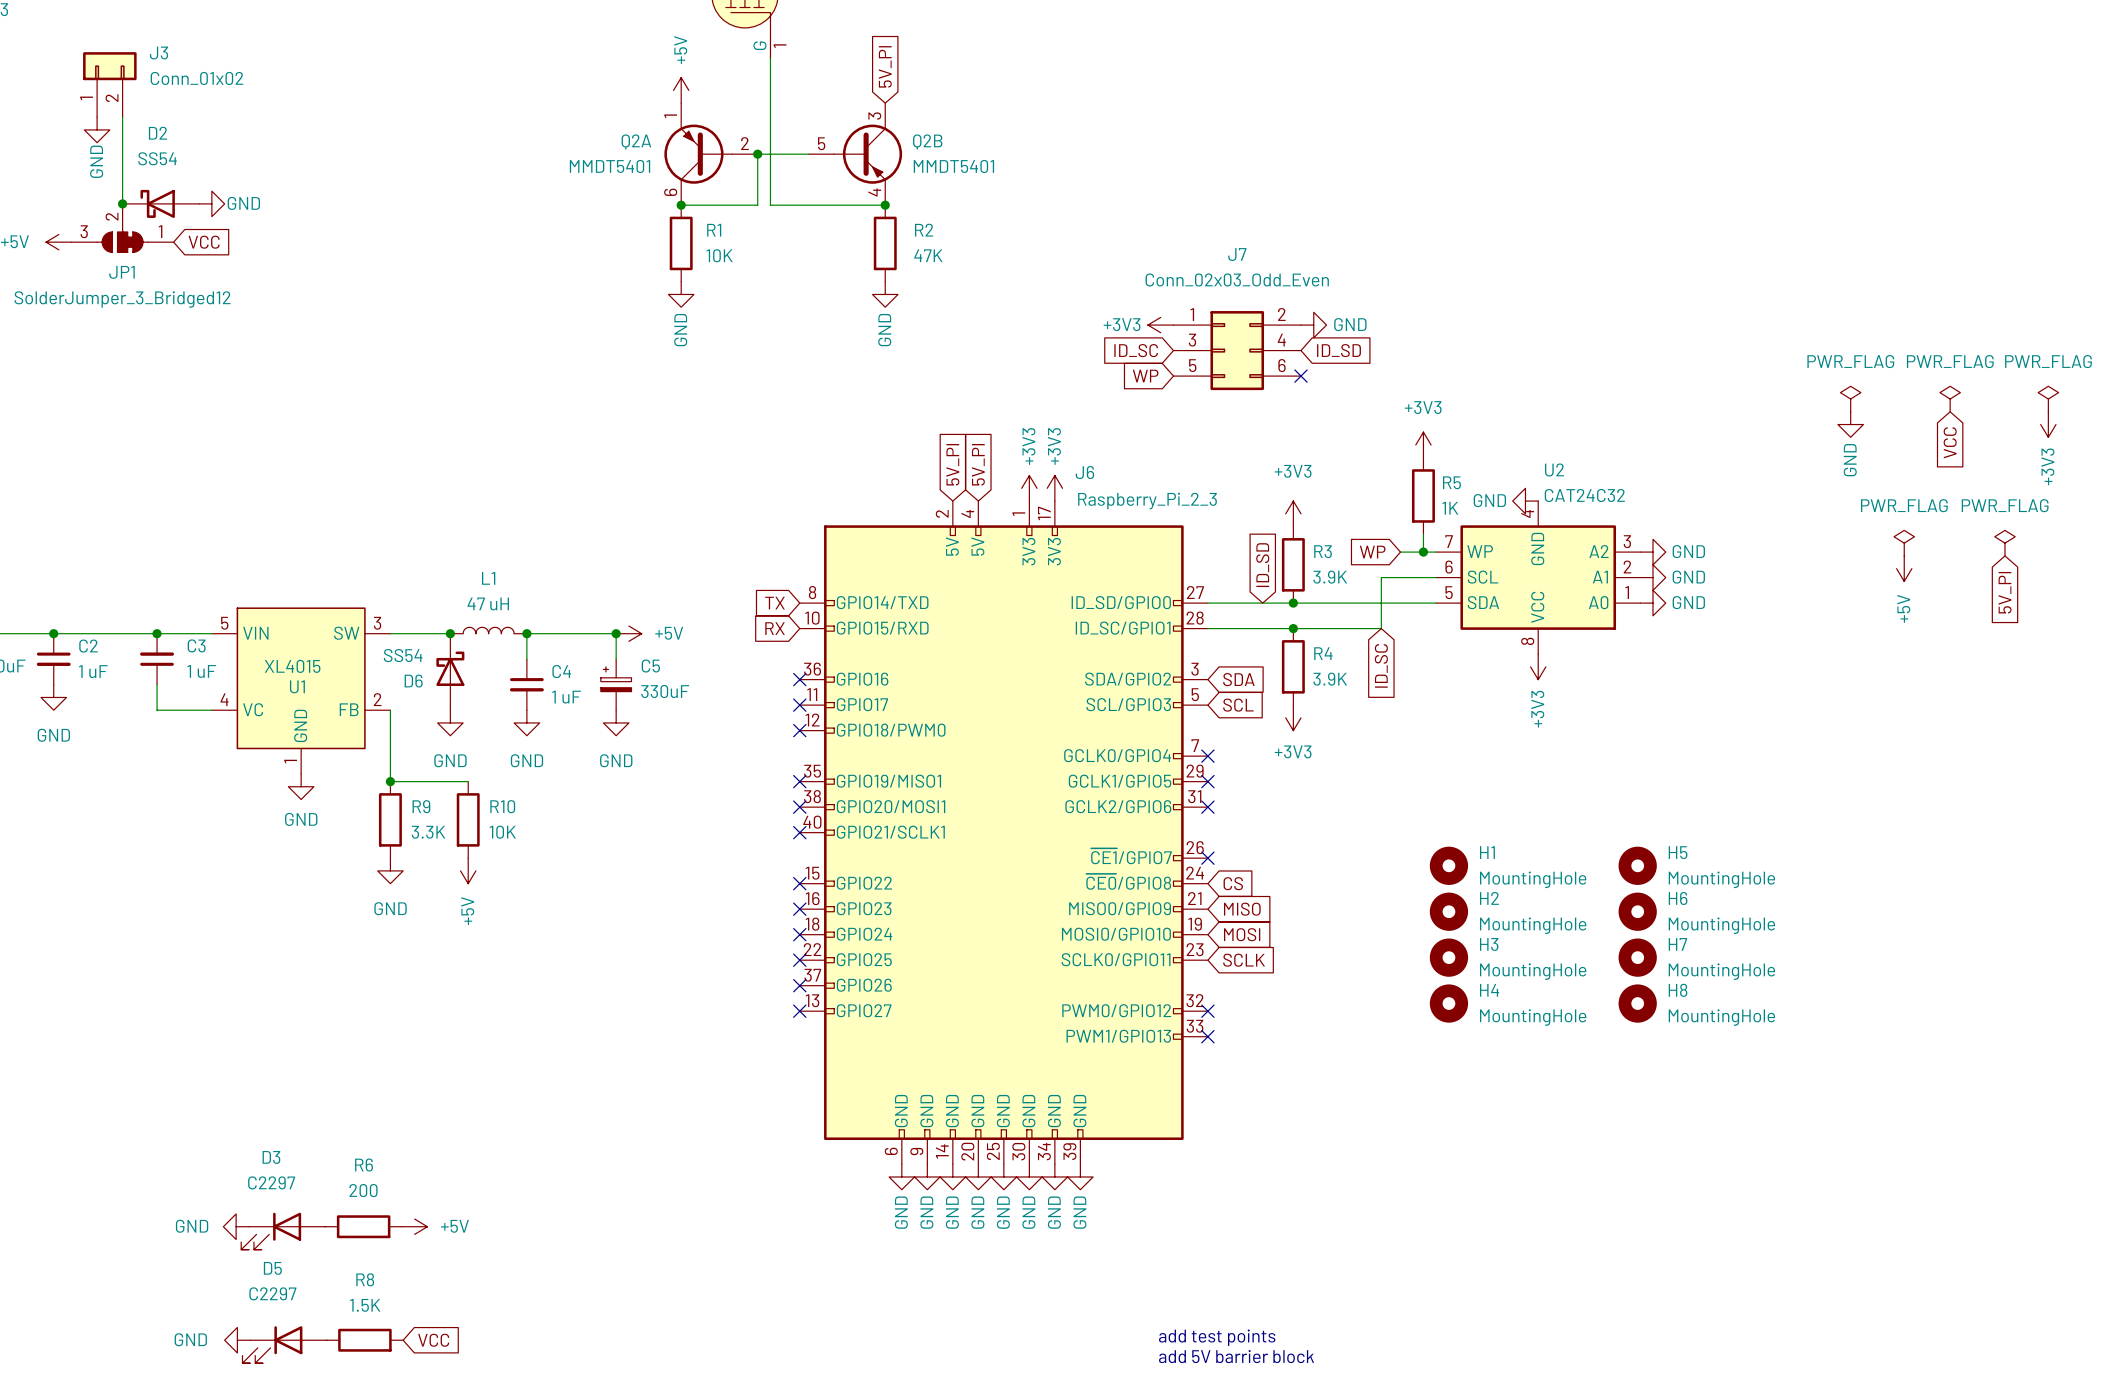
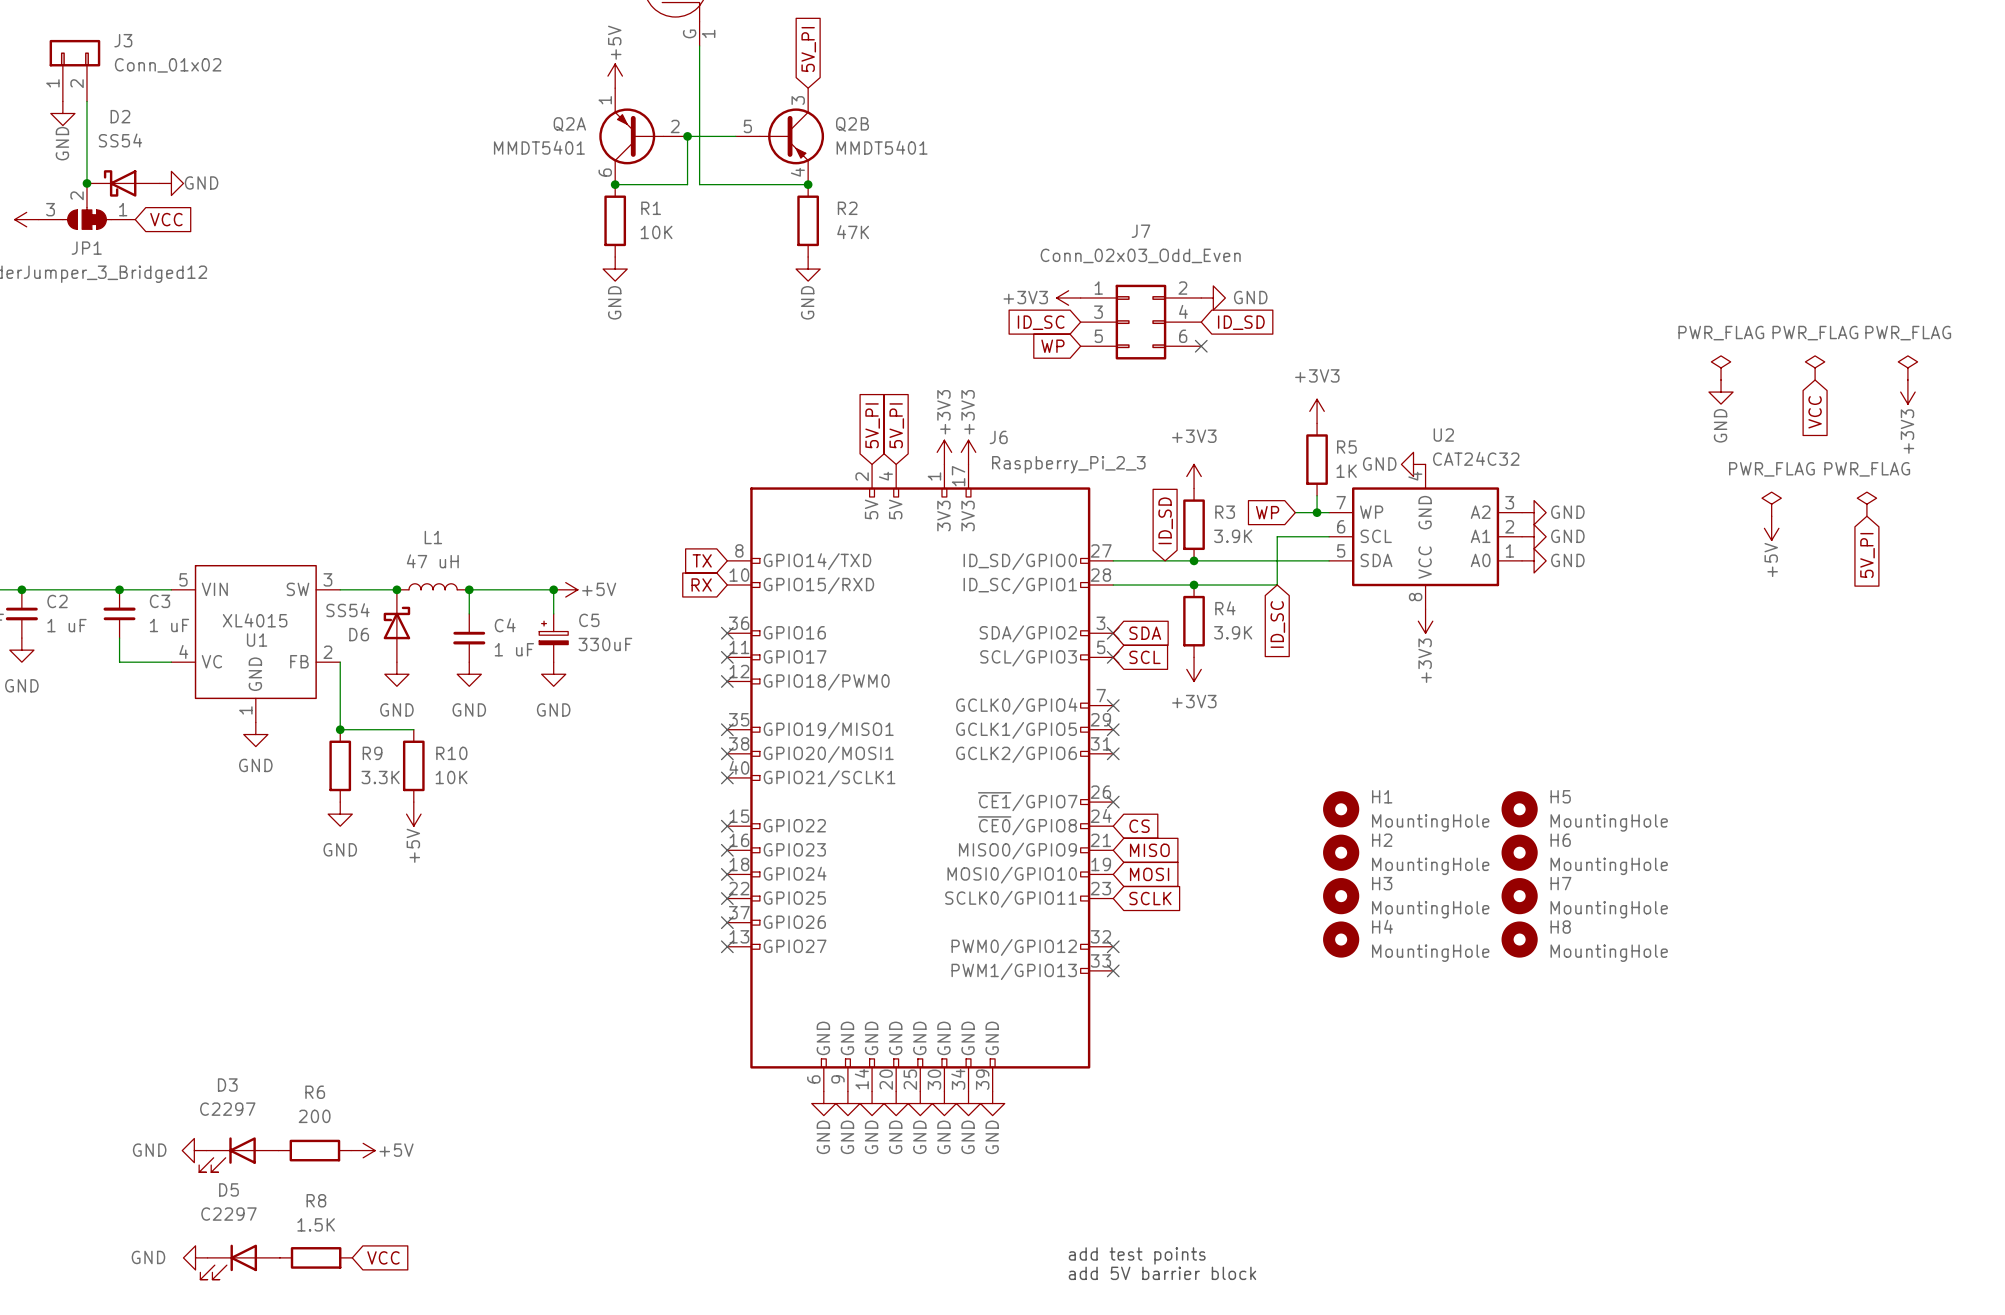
no-connect mark: none -> (1113, 633)
no-connect mark: none -> (1113, 657)

